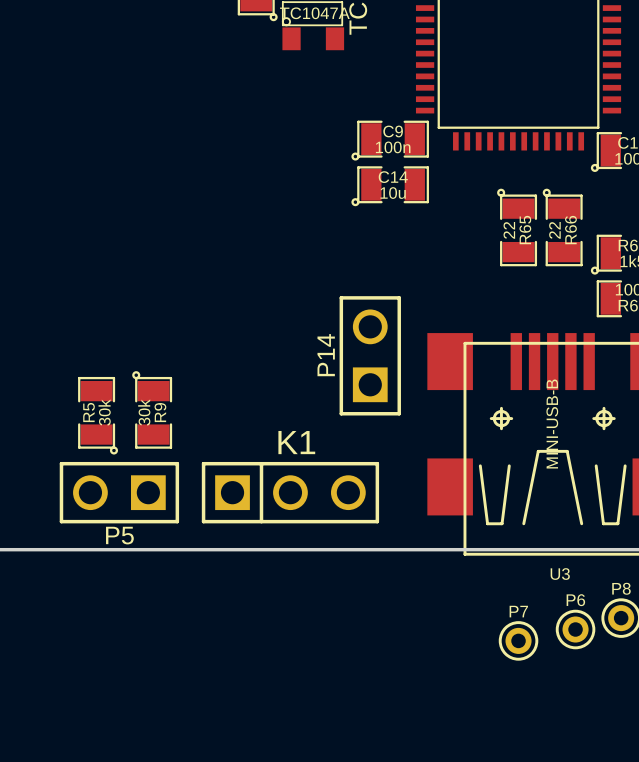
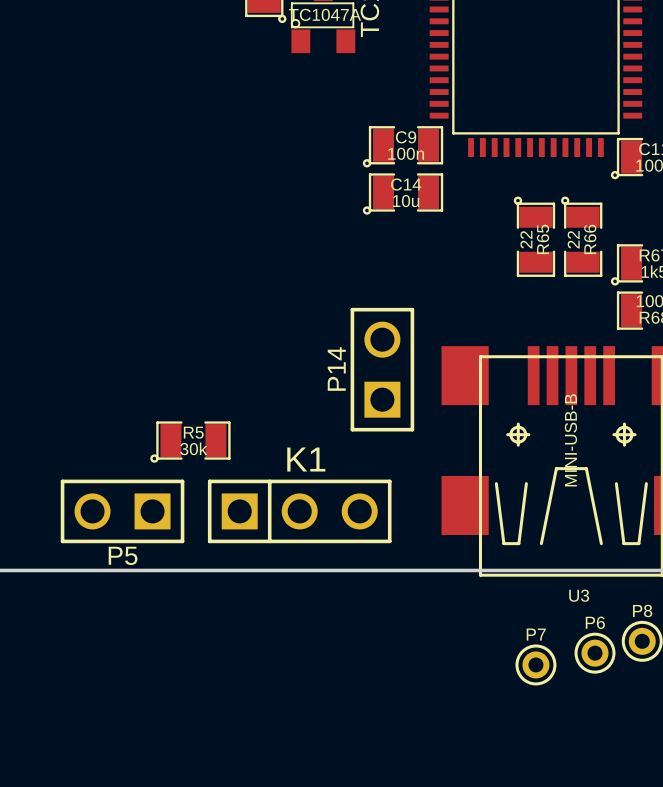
R9: 30k (152, 409) -> none
R5 rotation: 0° (98, 415) -> 90° clockwise (190, 442)
R5 position: (98, 415) -> (190, 442)

